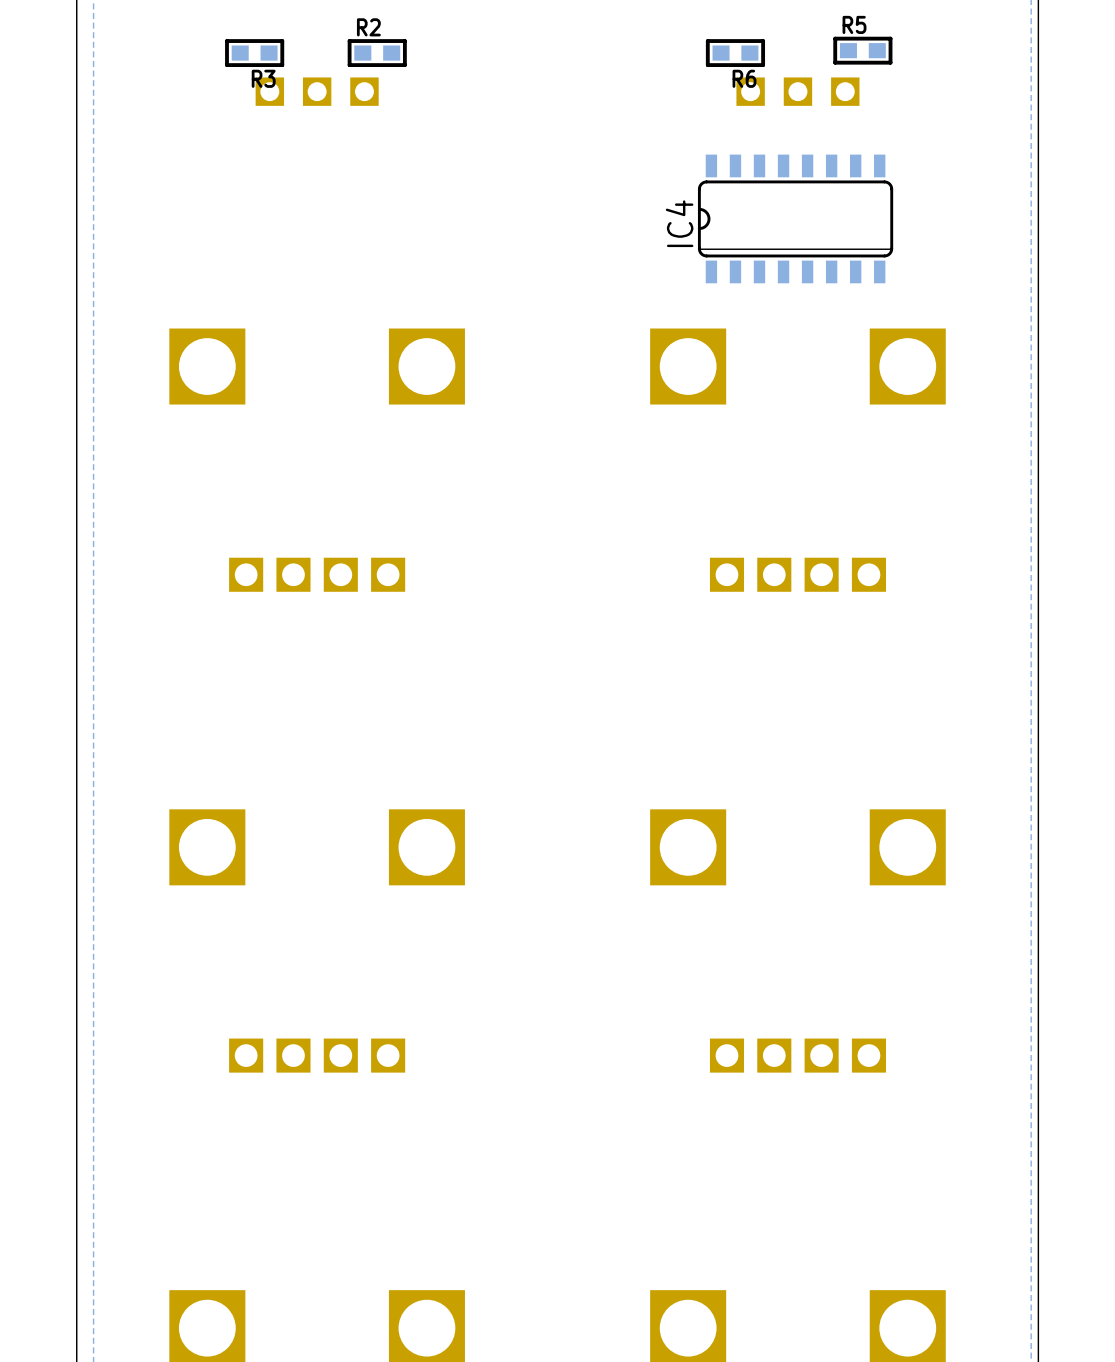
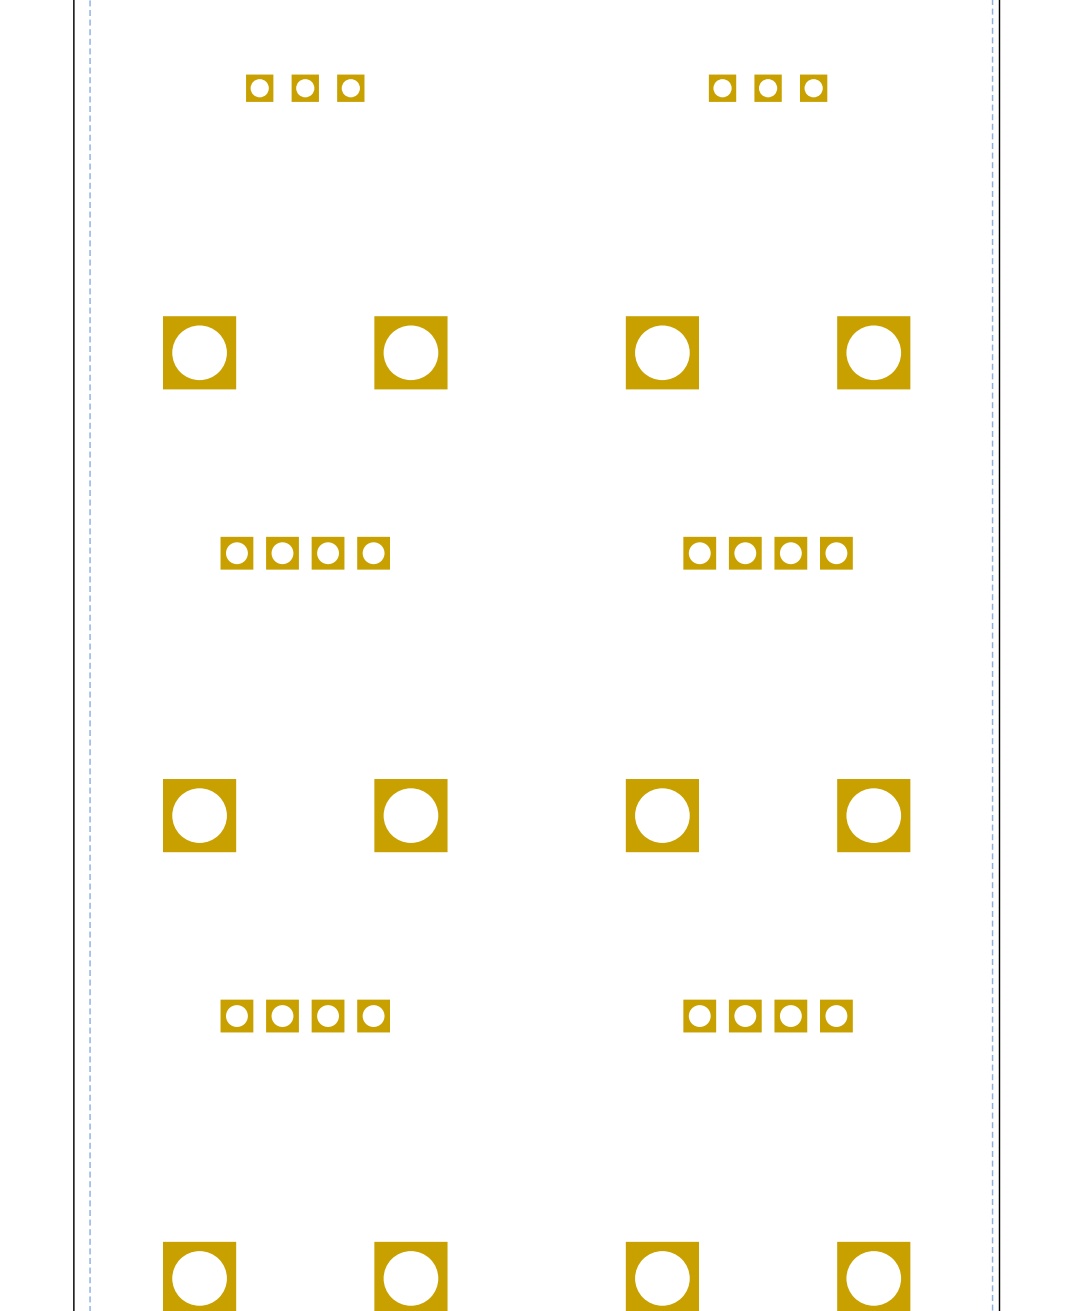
R5: (862, 50) -> none
R3: (254, 53) -> none
R2: (377, 53) -> none
R6: (735, 53) -> none
IC4: (795, 218) -> none

